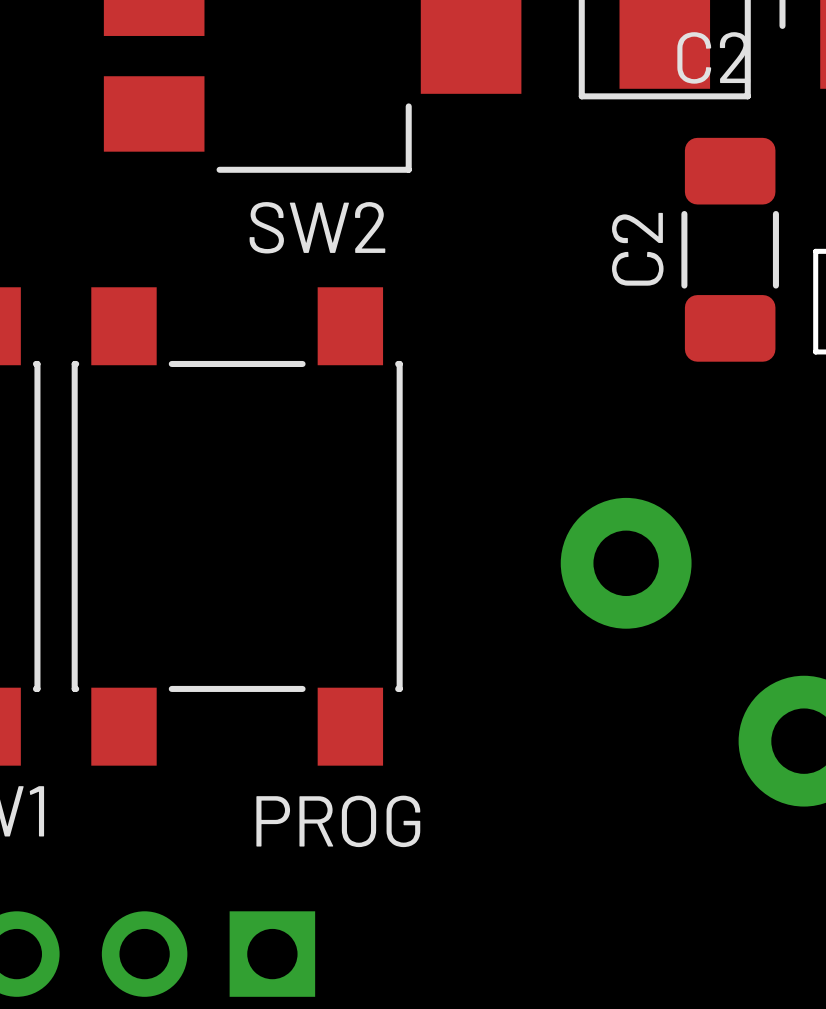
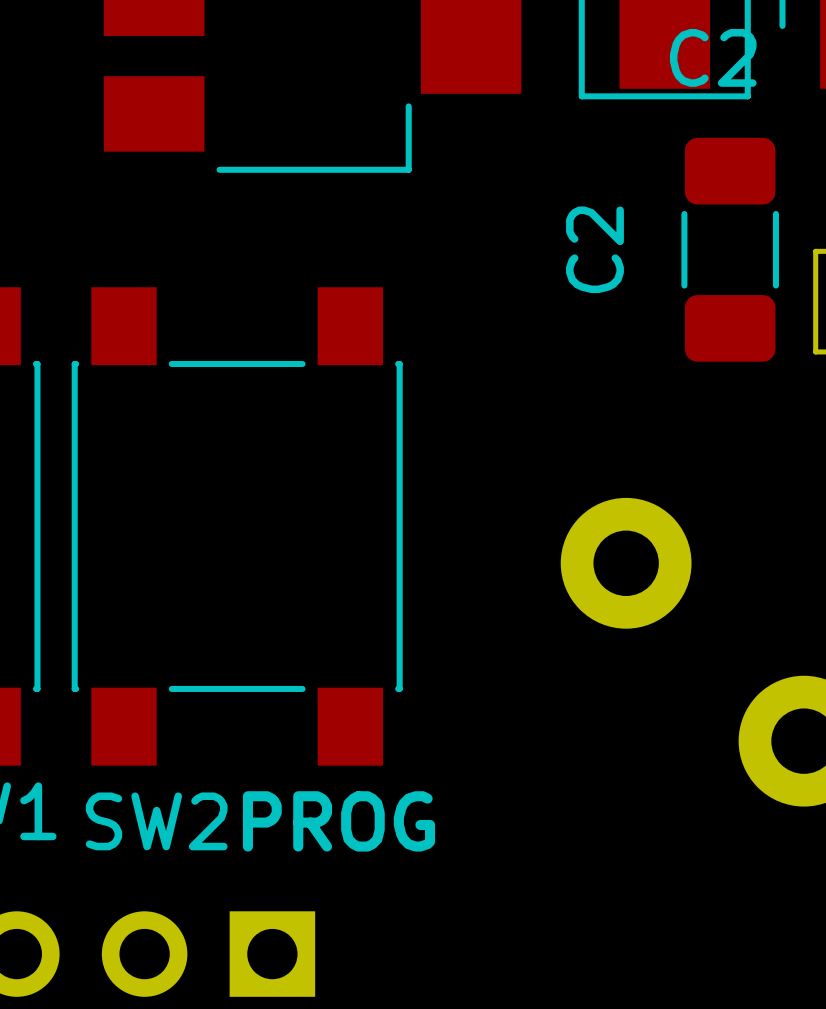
SW2 name position: SW2 (317, 227) -> SW2 (156, 821)
C2 name position: C2 (637, 249) -> C2 (594, 249)

